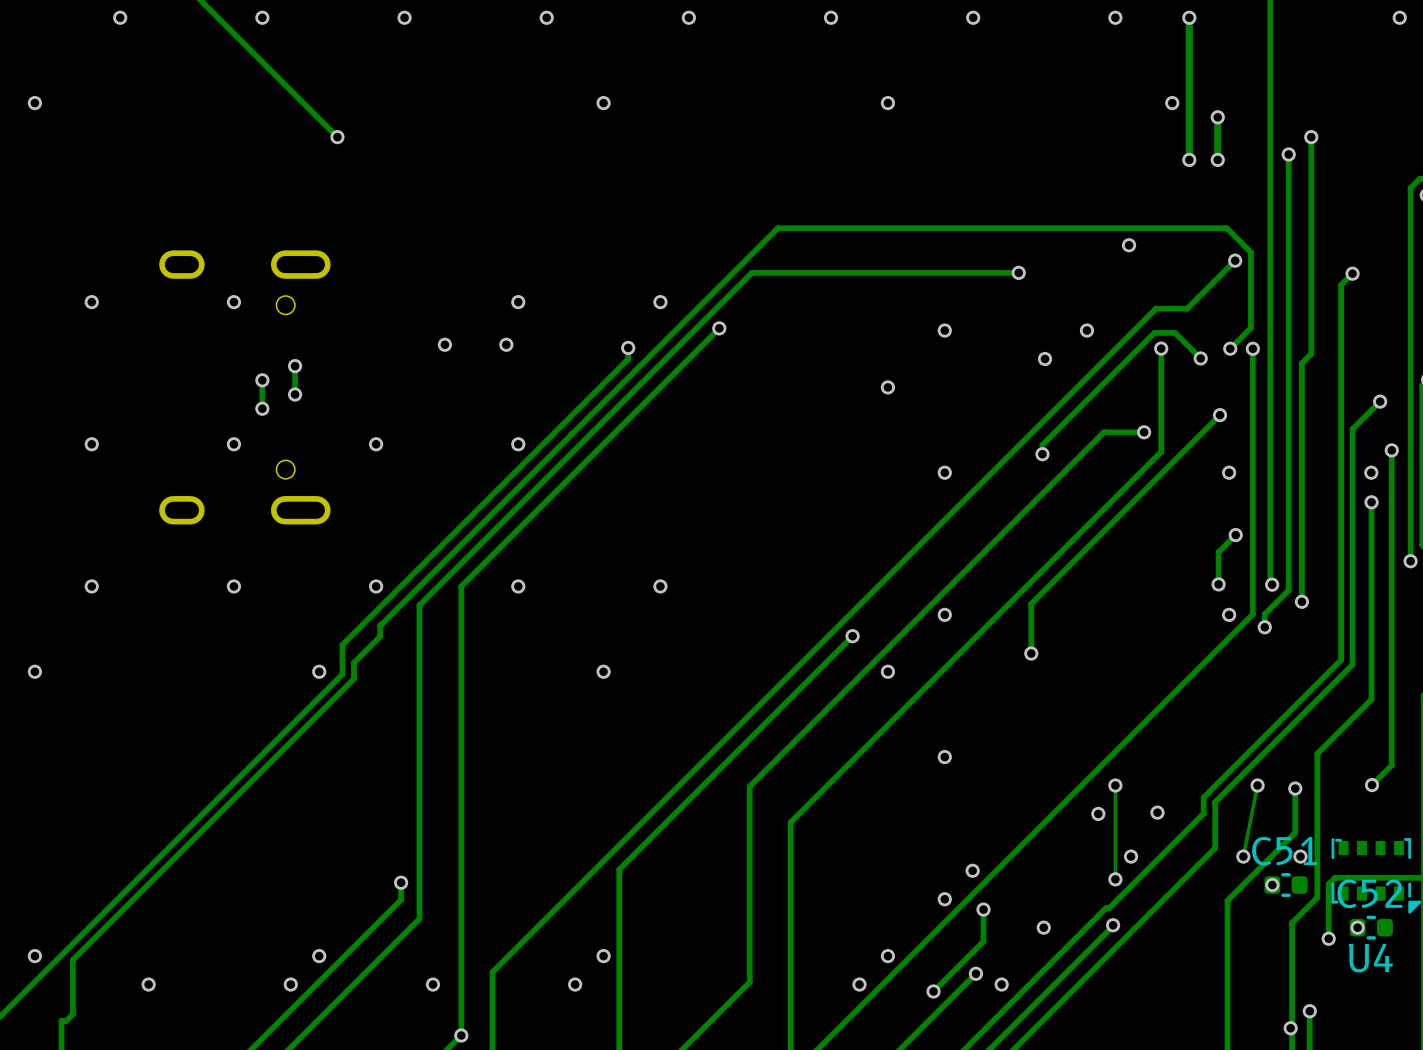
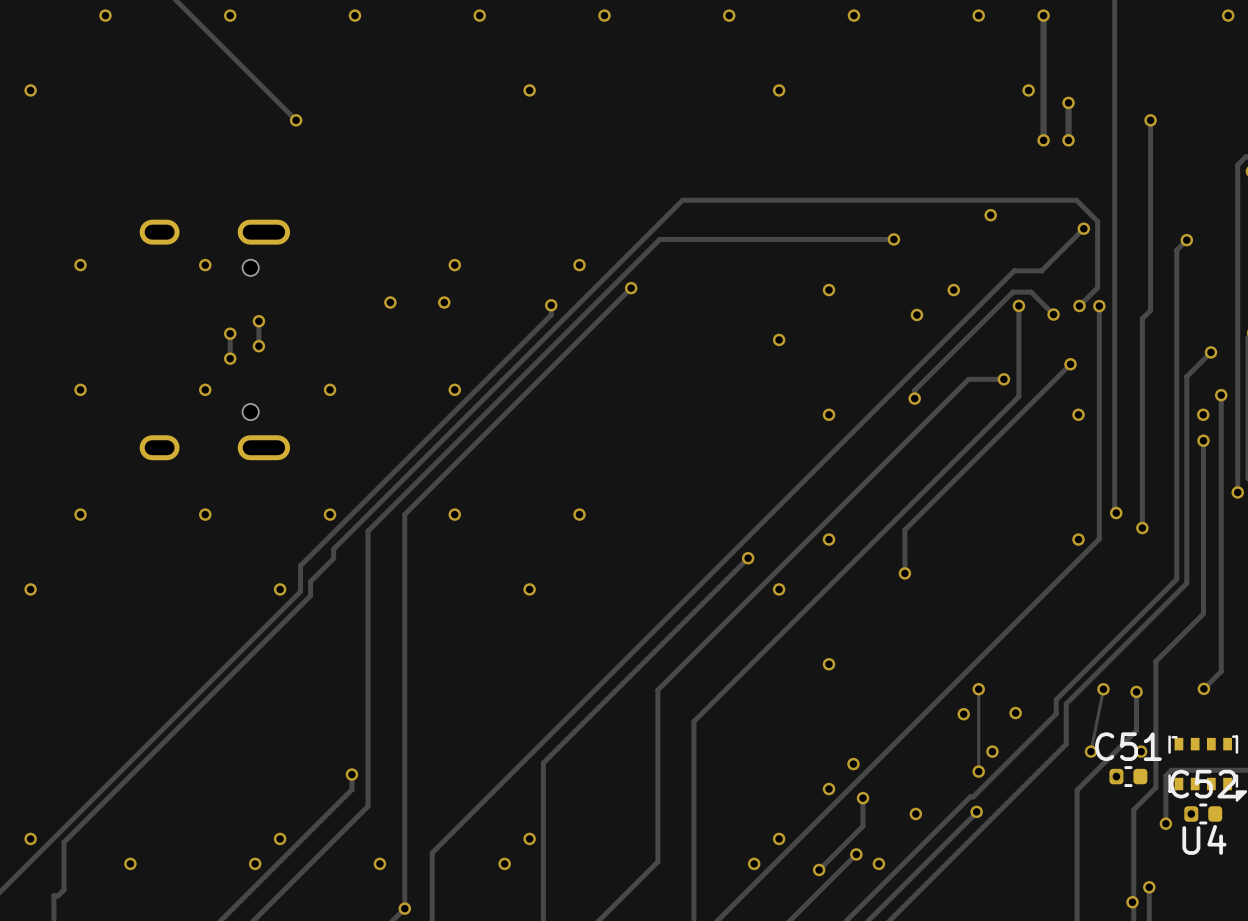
track: (1288, 154) (1288, 590) (1264, 614) (1264, 627) -> none
via: (1288, 154) -> none
track: (1235, 535) (1218, 552) (1218, 584) -> none
via: (1235, 535) -> none
via: (1218, 584) -> none
via: (1264, 627) -> none

